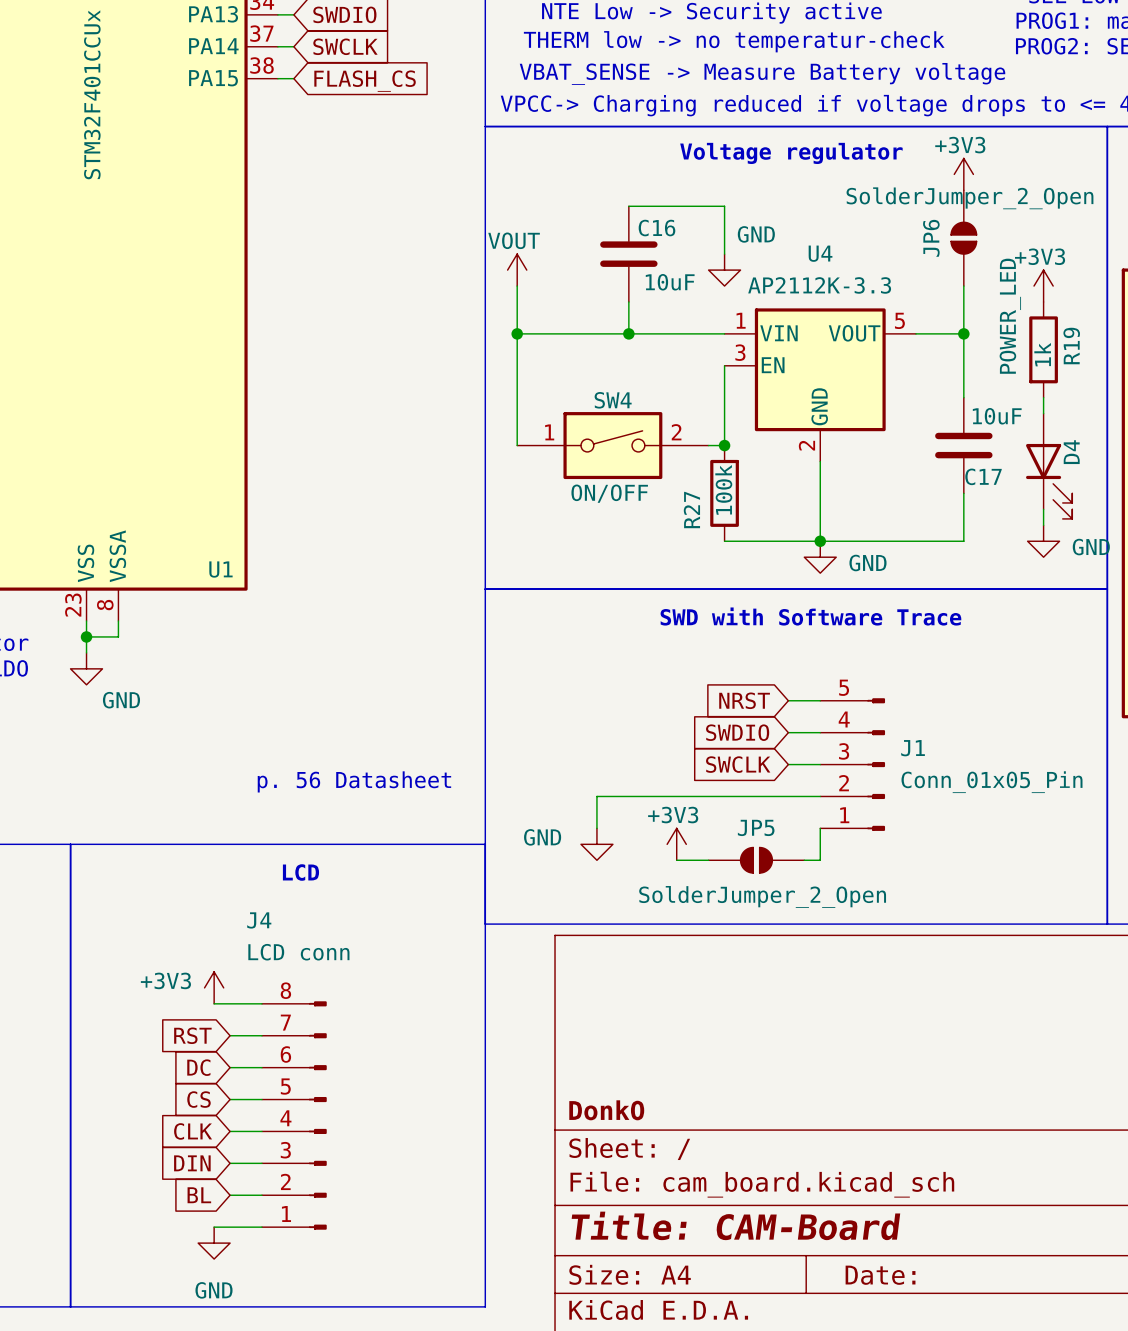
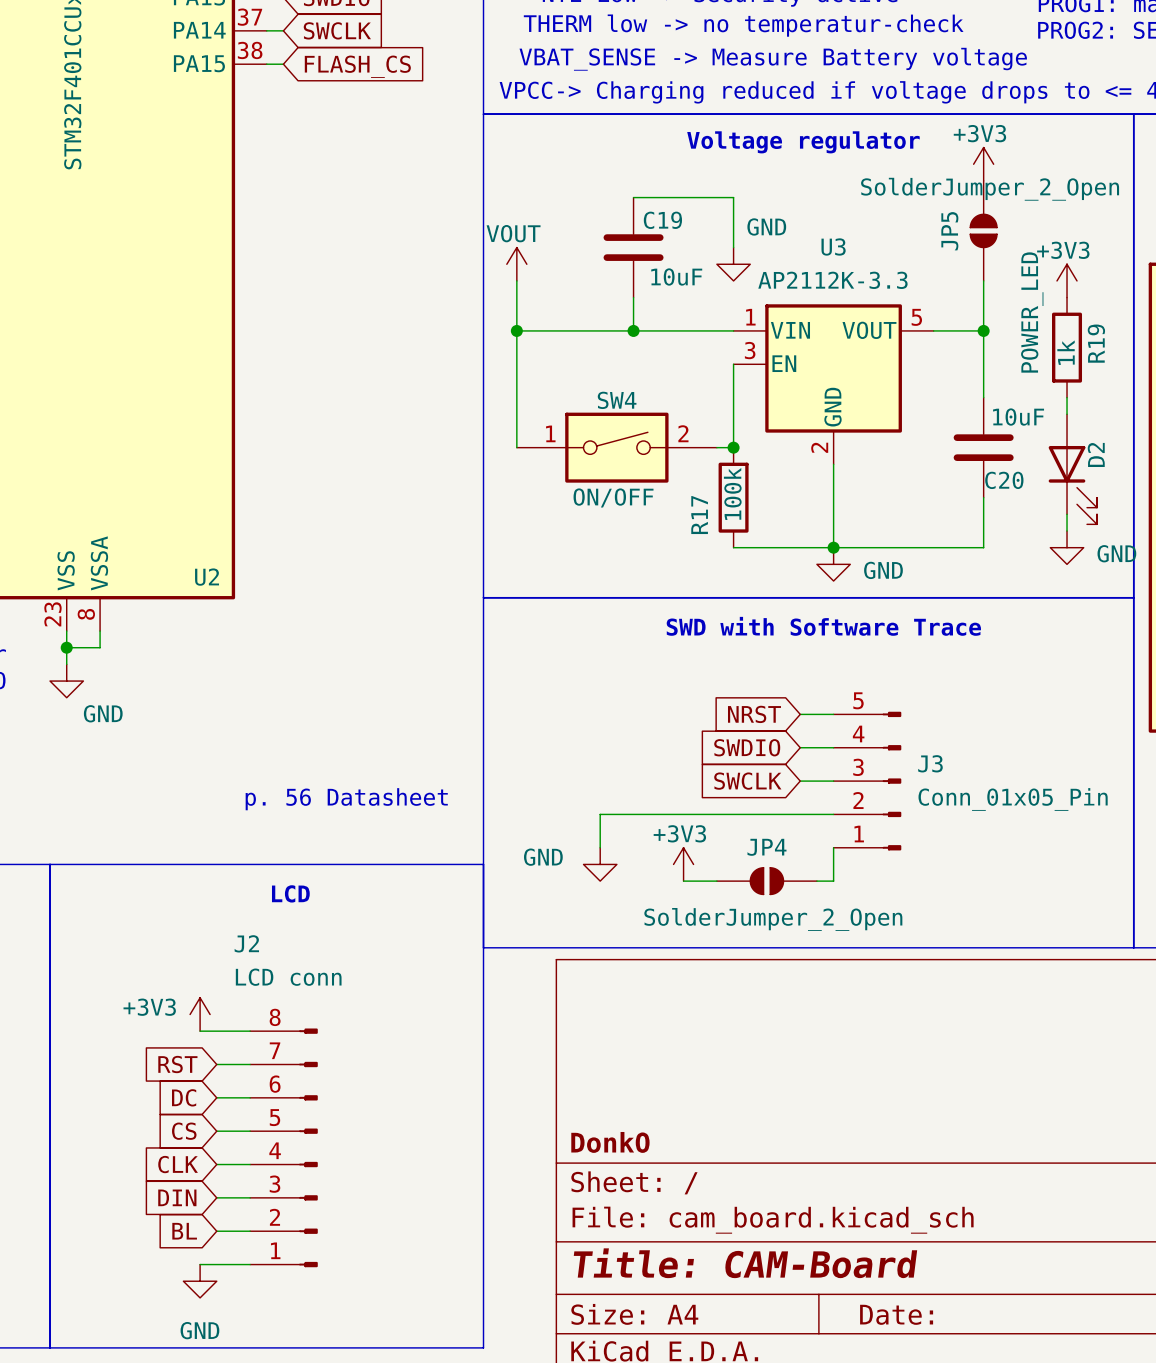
C16 name: C16 (656, 228) -> C19 (662, 220)
JP6 name: JP6 (931, 238) -> JP5 (949, 231)
U4 name: U4 (820, 253) -> U3 (833, 246)
D4 name: D4 (1071, 452) -> D2 (1096, 454)
C17 name: C17 (983, 476) -> C20 (1004, 480)
R27 name: R27 (691, 510) -> R17 (699, 515)
U1 name: U1 (220, 569) -> U2 (207, 577)
J1 name: J1 (913, 748) -> J3 (930, 763)
JP5 name: JP5 (756, 827) -> JP4 (766, 847)
J4 name: J4 (259, 920) -> J2 (246, 943)

